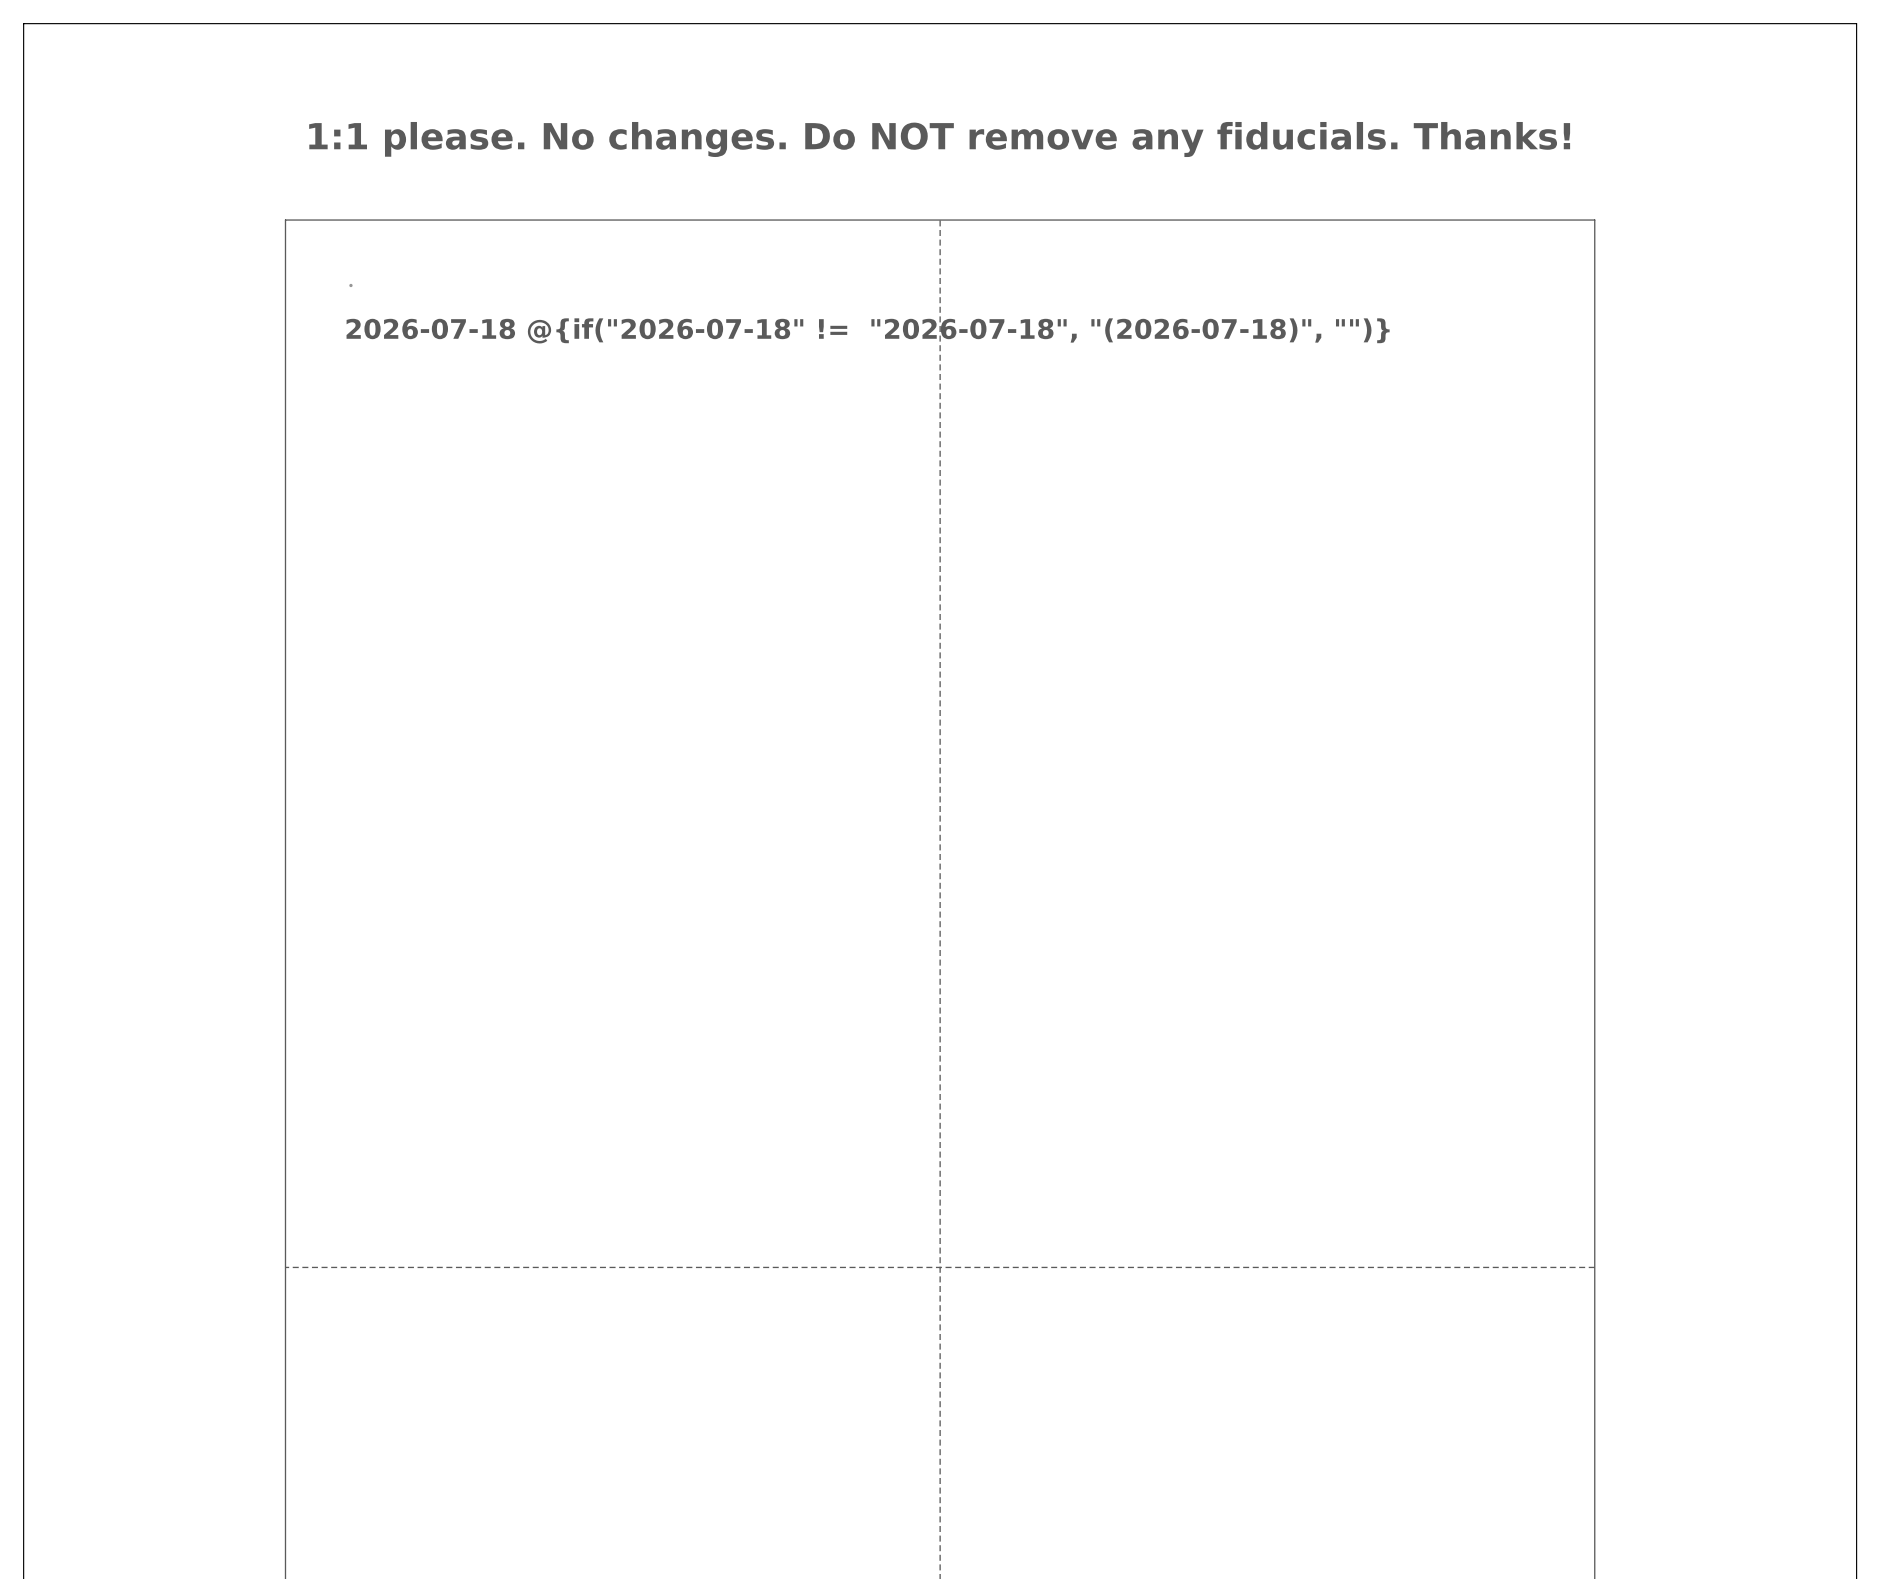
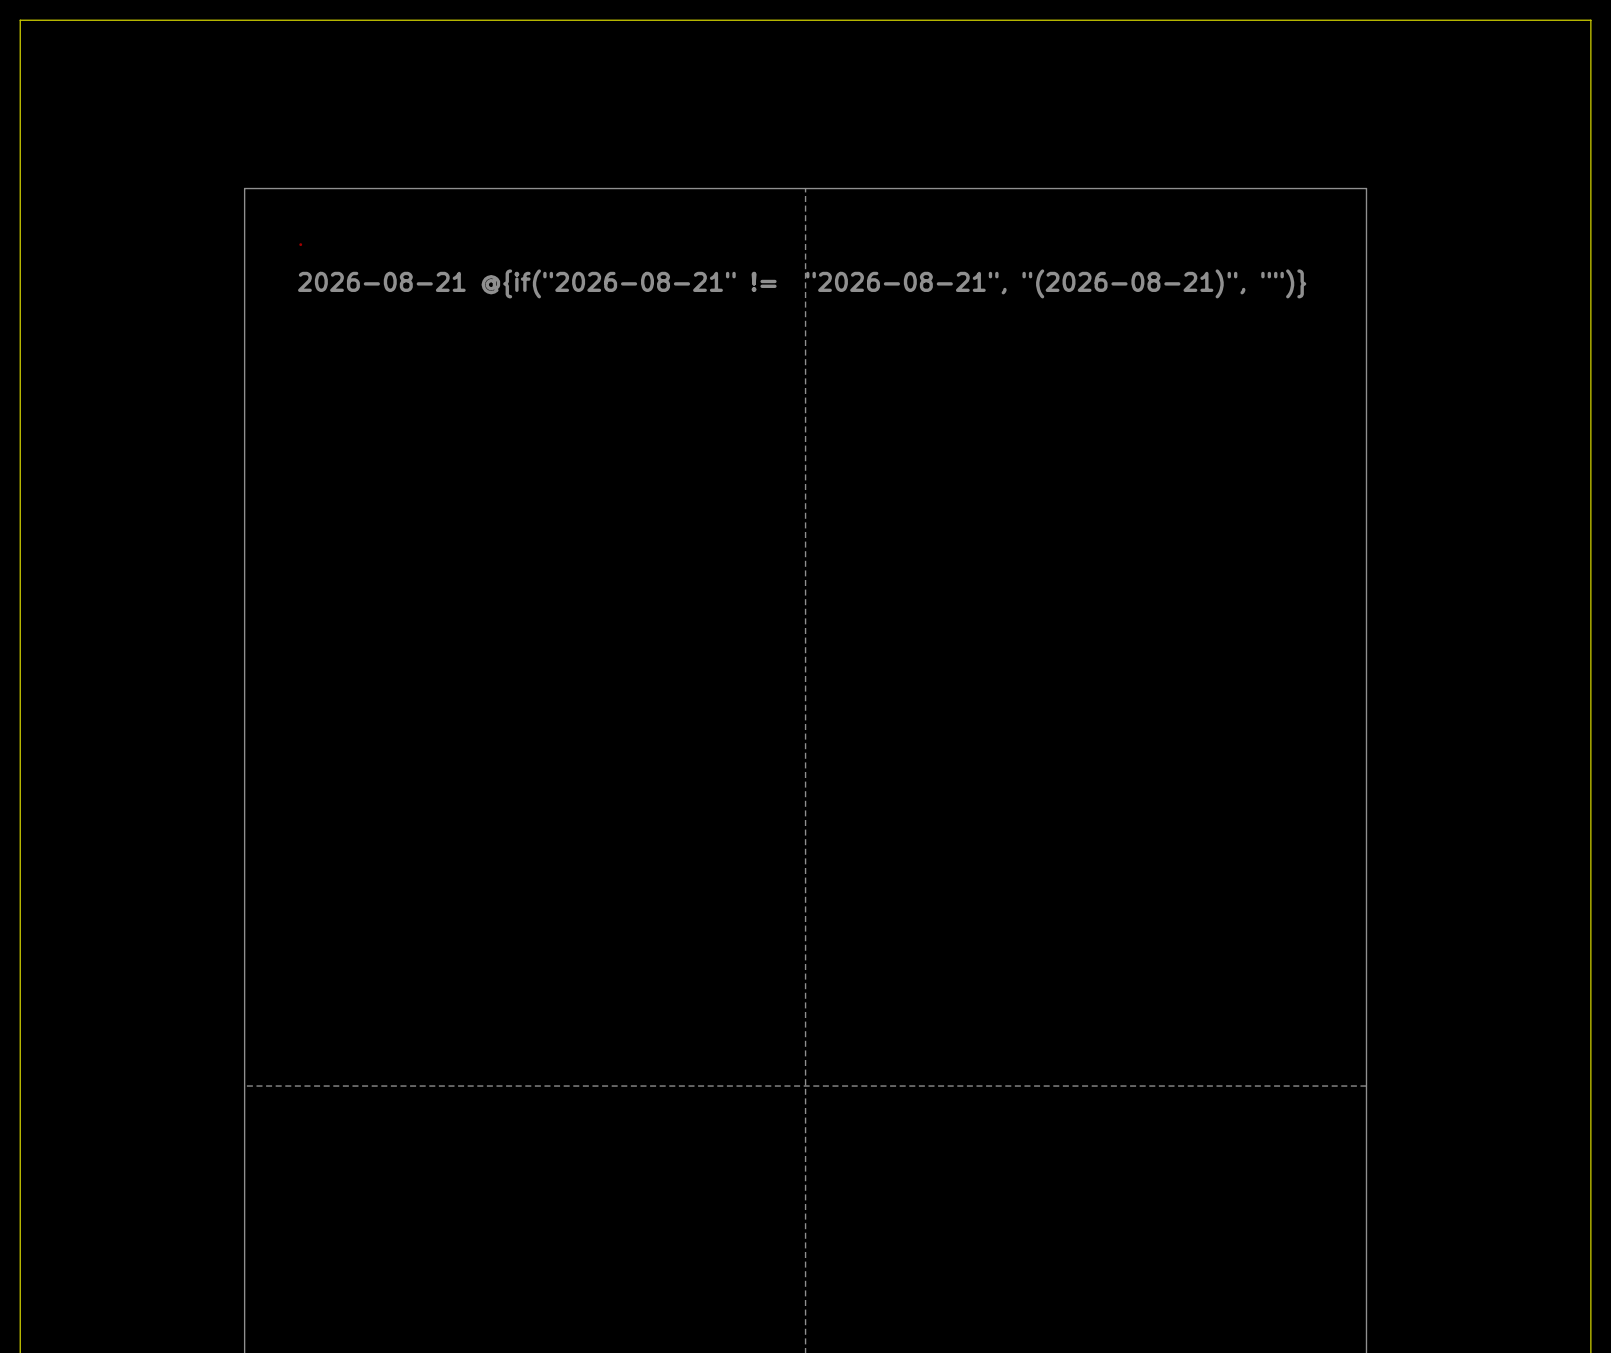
text: 1:1 please. No changes. Do NOT remove any fiducials. Thanks! (939, 139) -> none
text: 2026-07-18 @{if("2026-07-18" != "2026-07-18", "(2026-07-18)", "")} (868, 330) -> 2026-08-21 @{if("2026-08-21" != "2026-08-21", "(2026-08-21)", "")} (802, 283)

